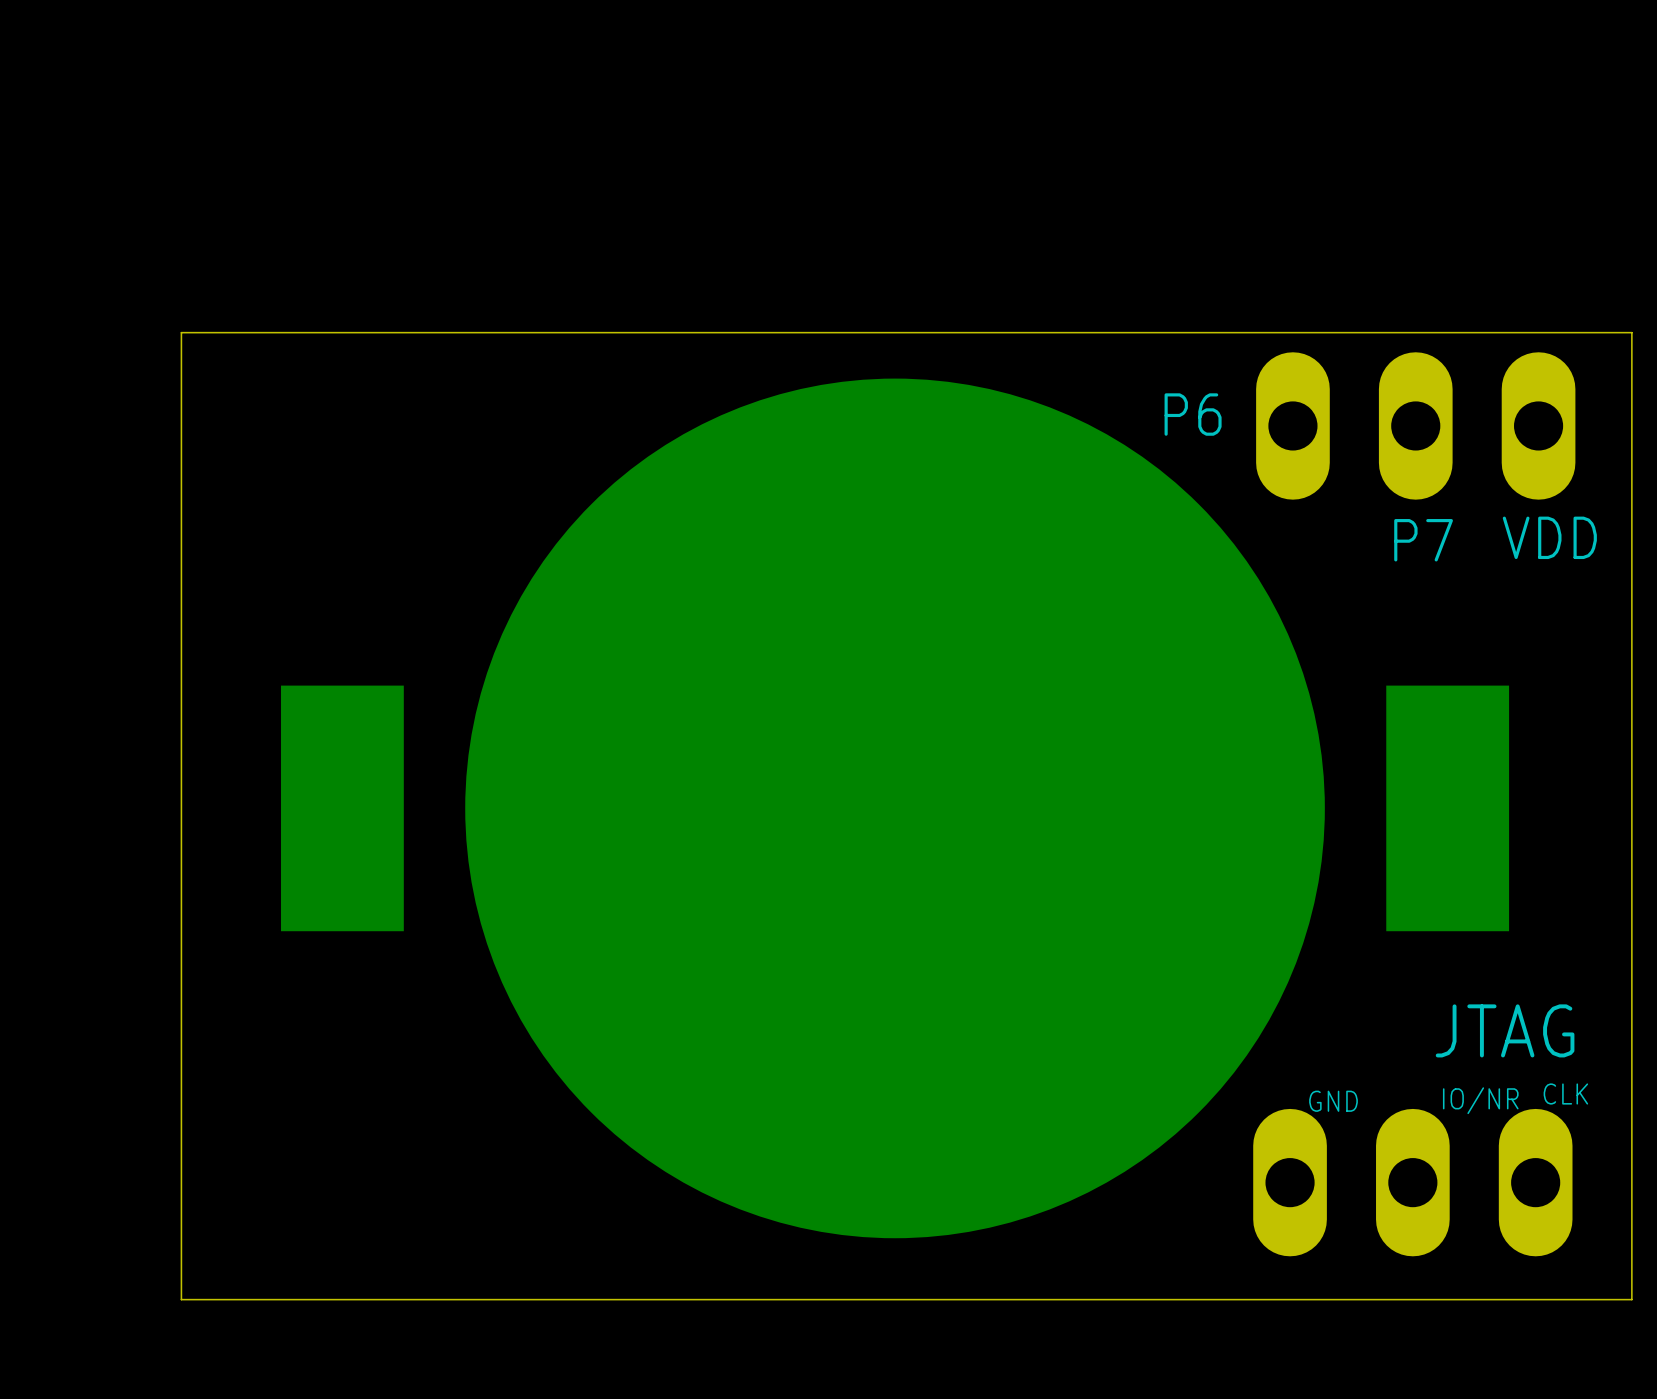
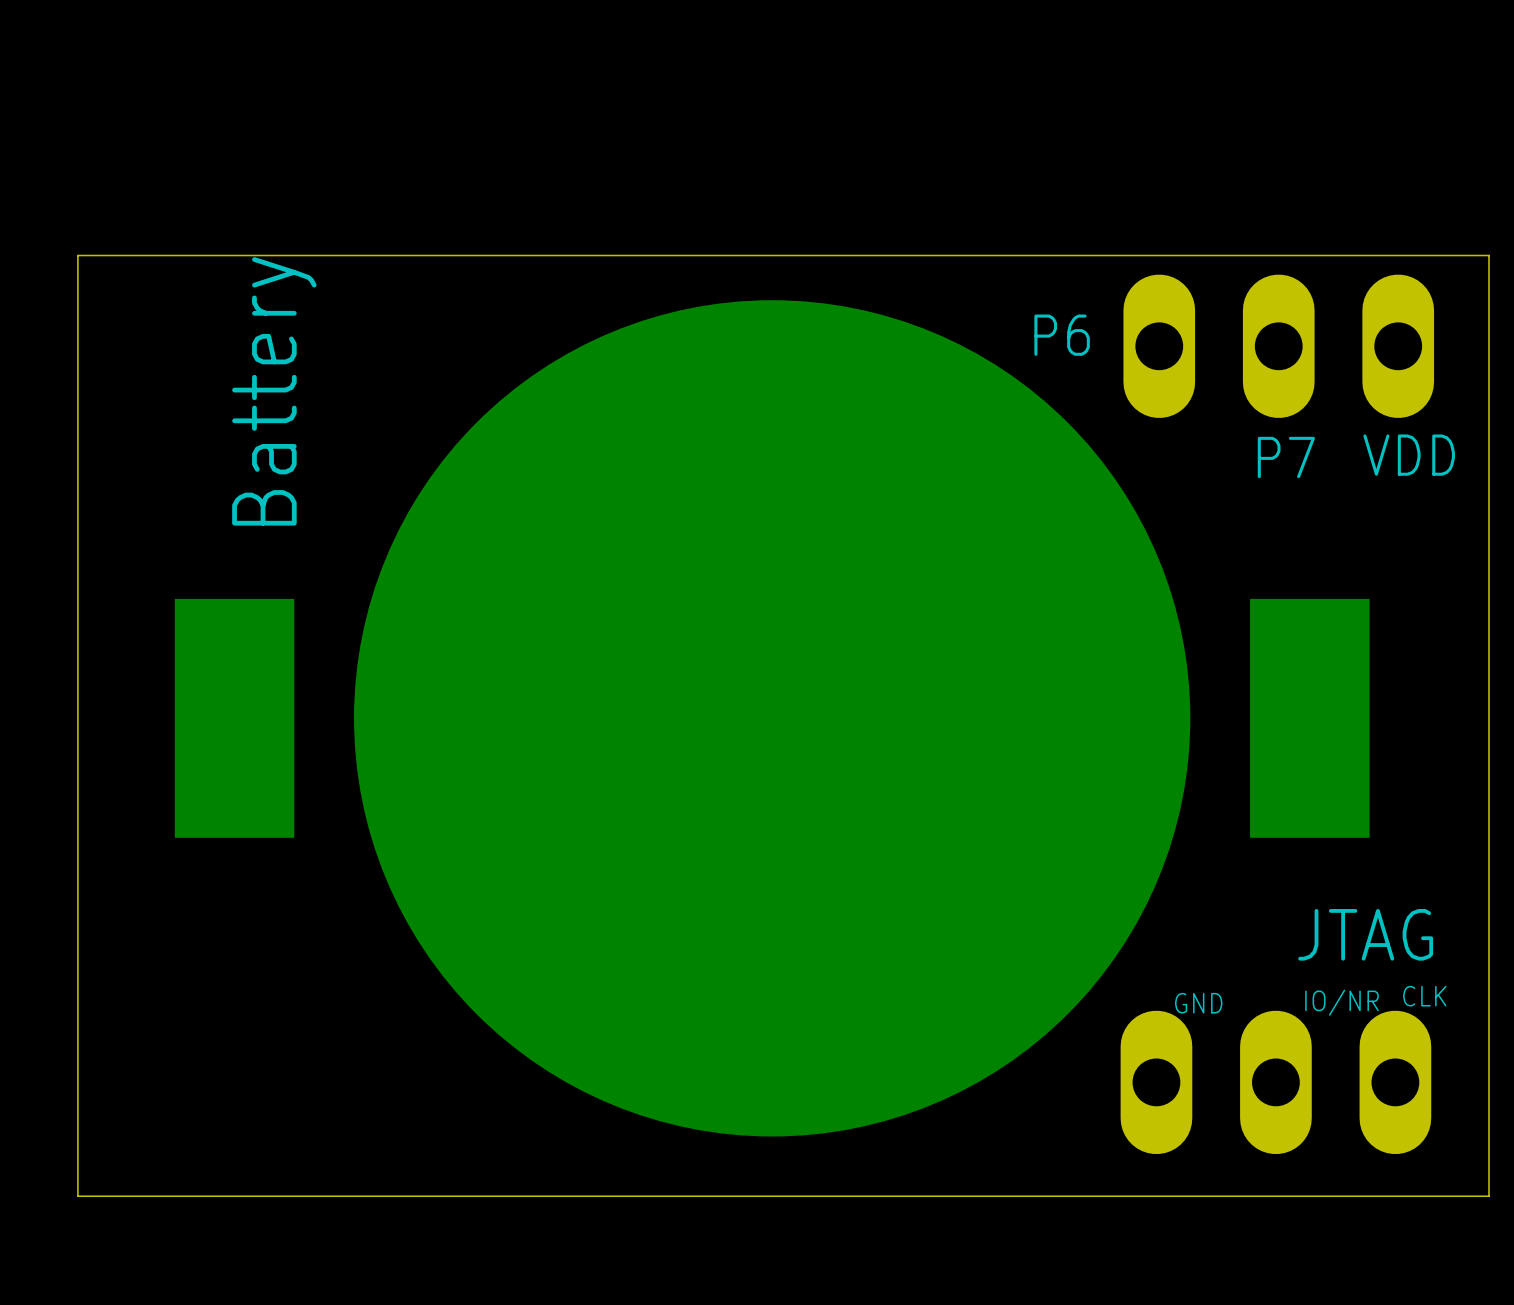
part text: none -> Battery (274, 391)

